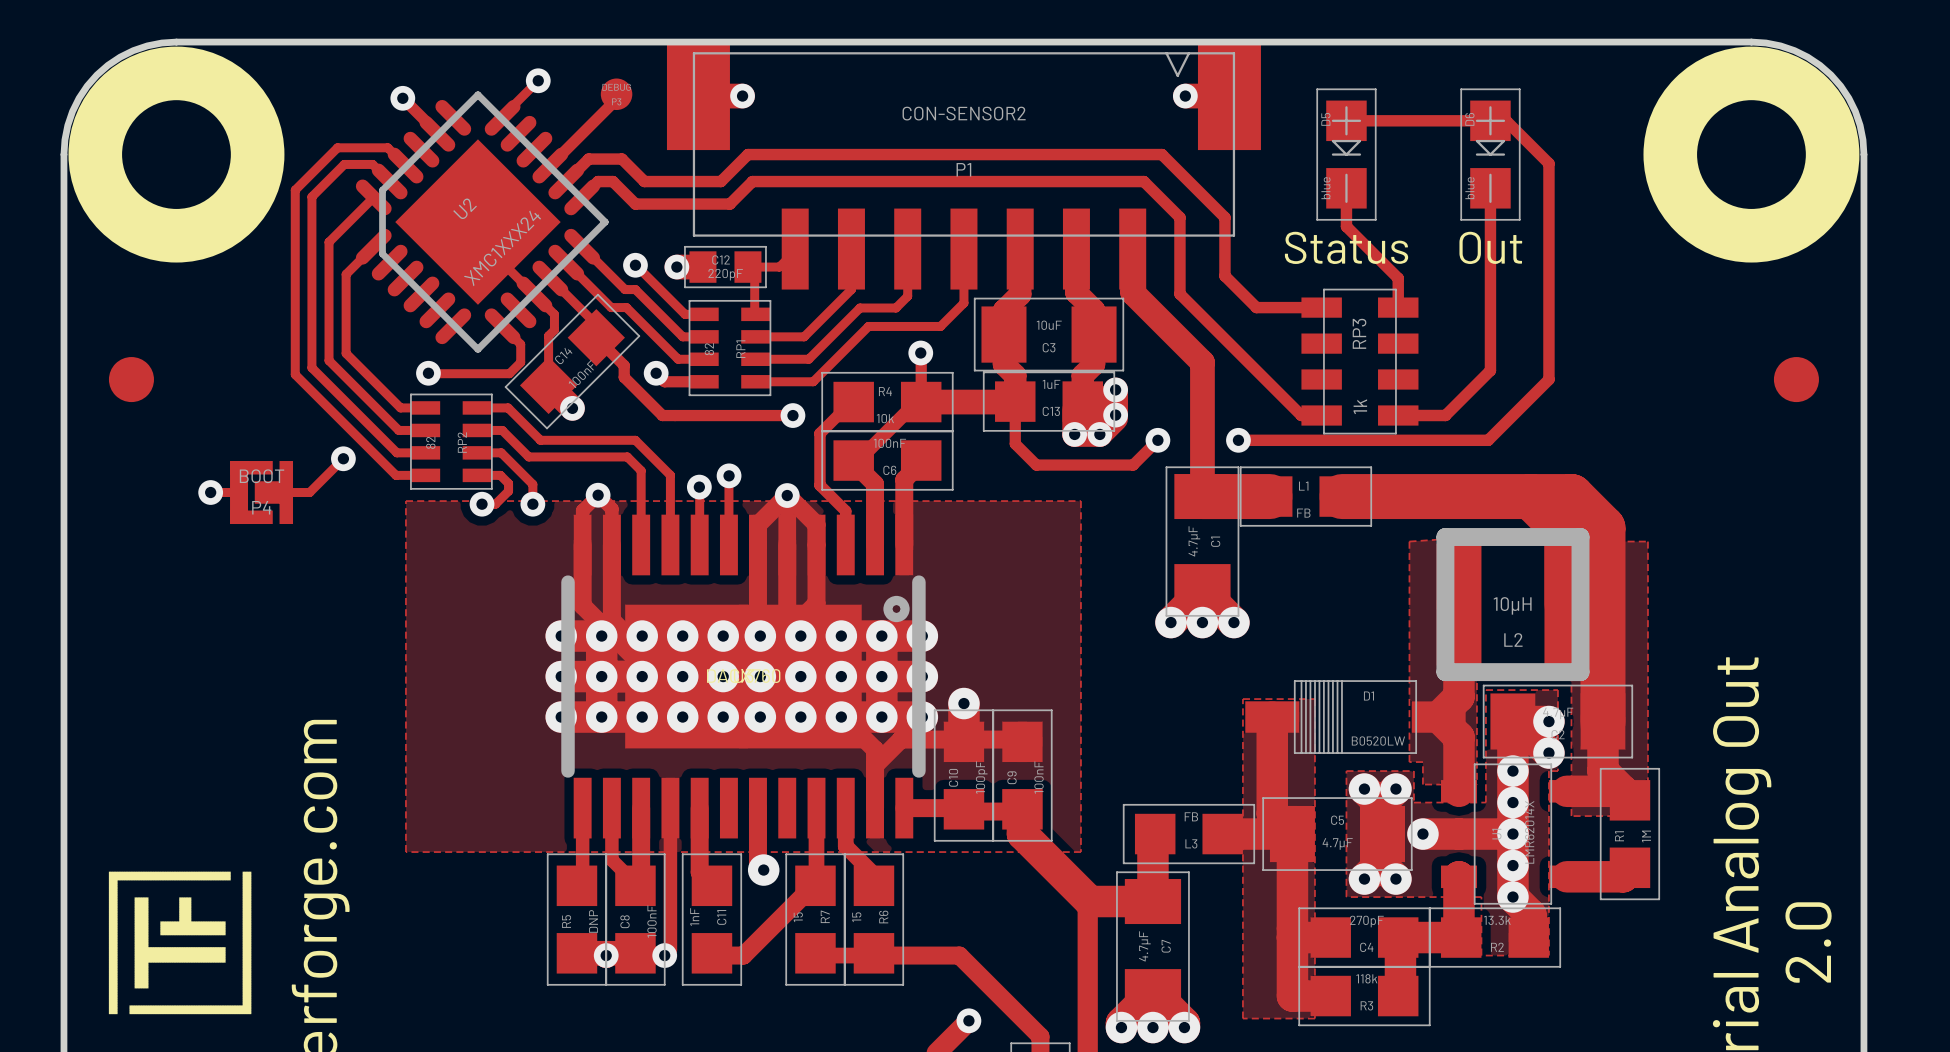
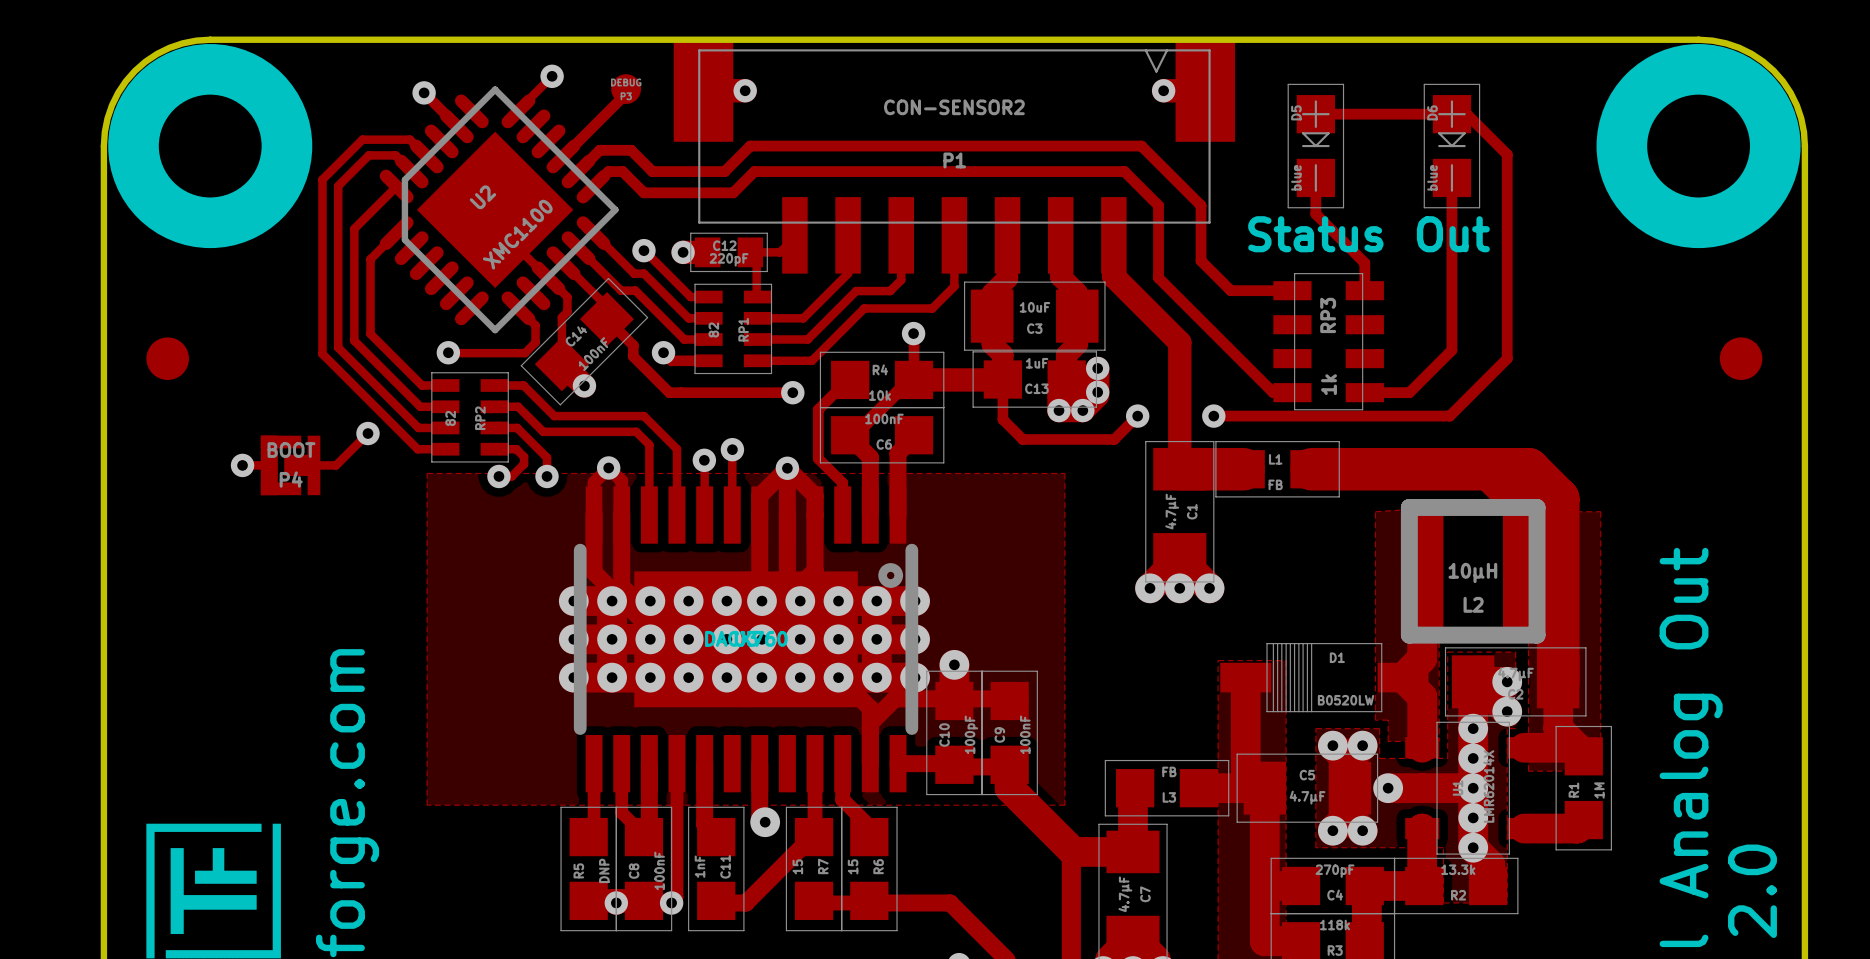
U2 value: XMC1XXX24 (502, 248) -> XMC1100 (517, 234)

